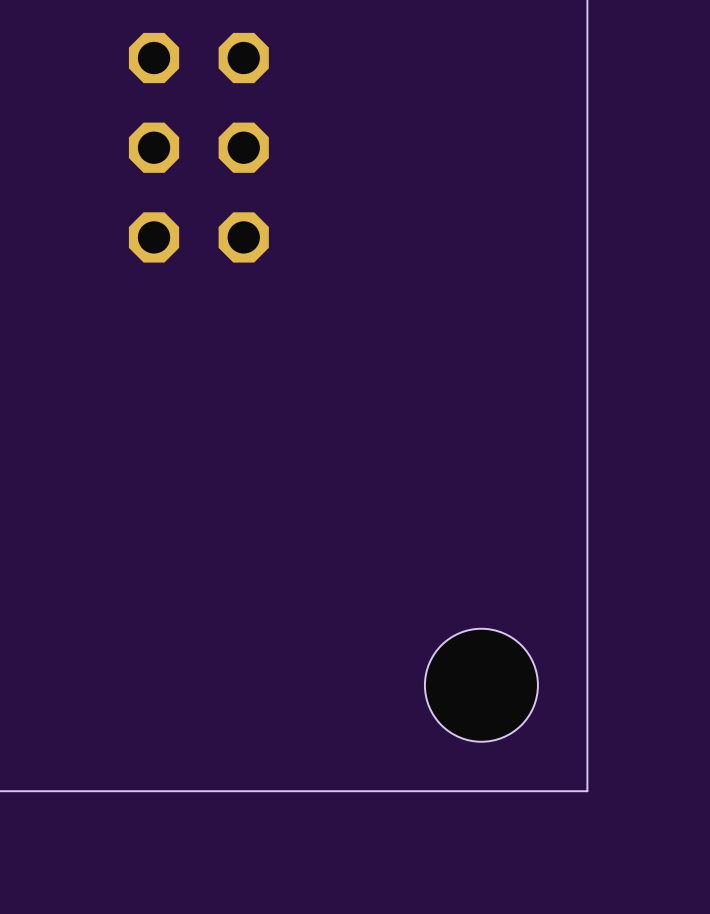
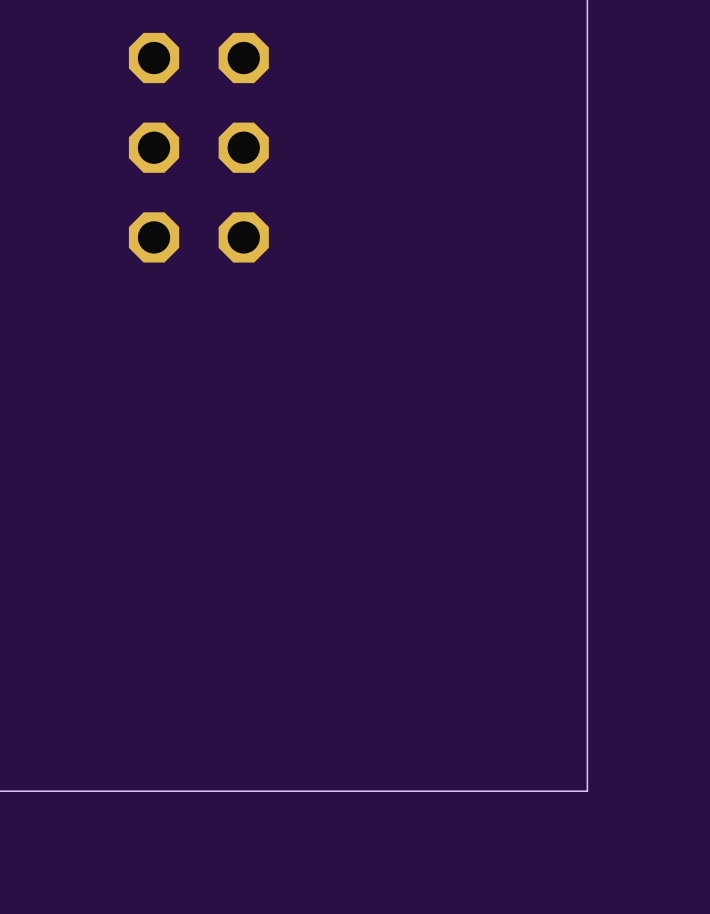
hole: (481, 685) -> none

